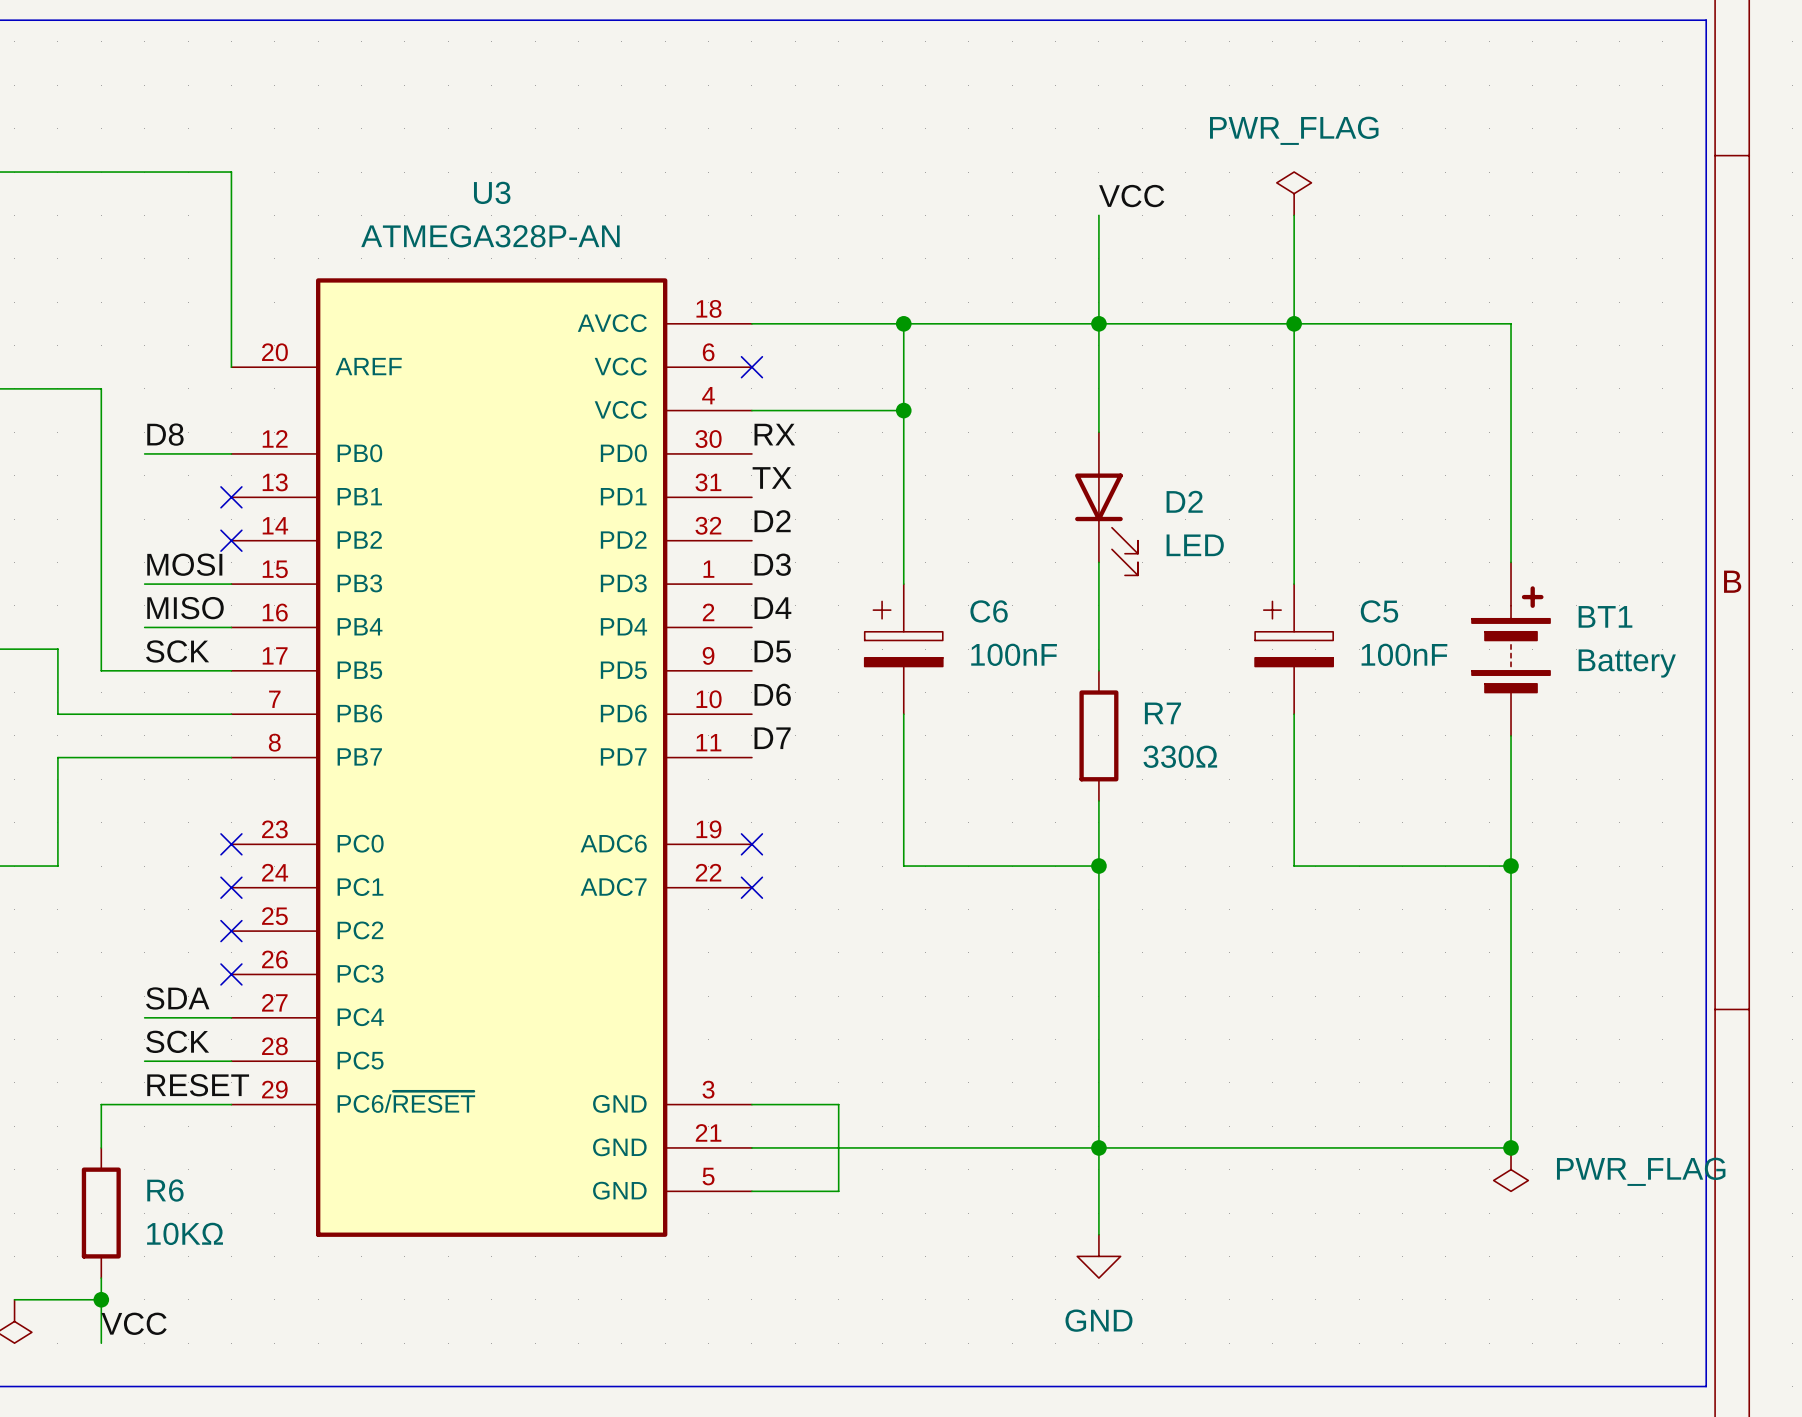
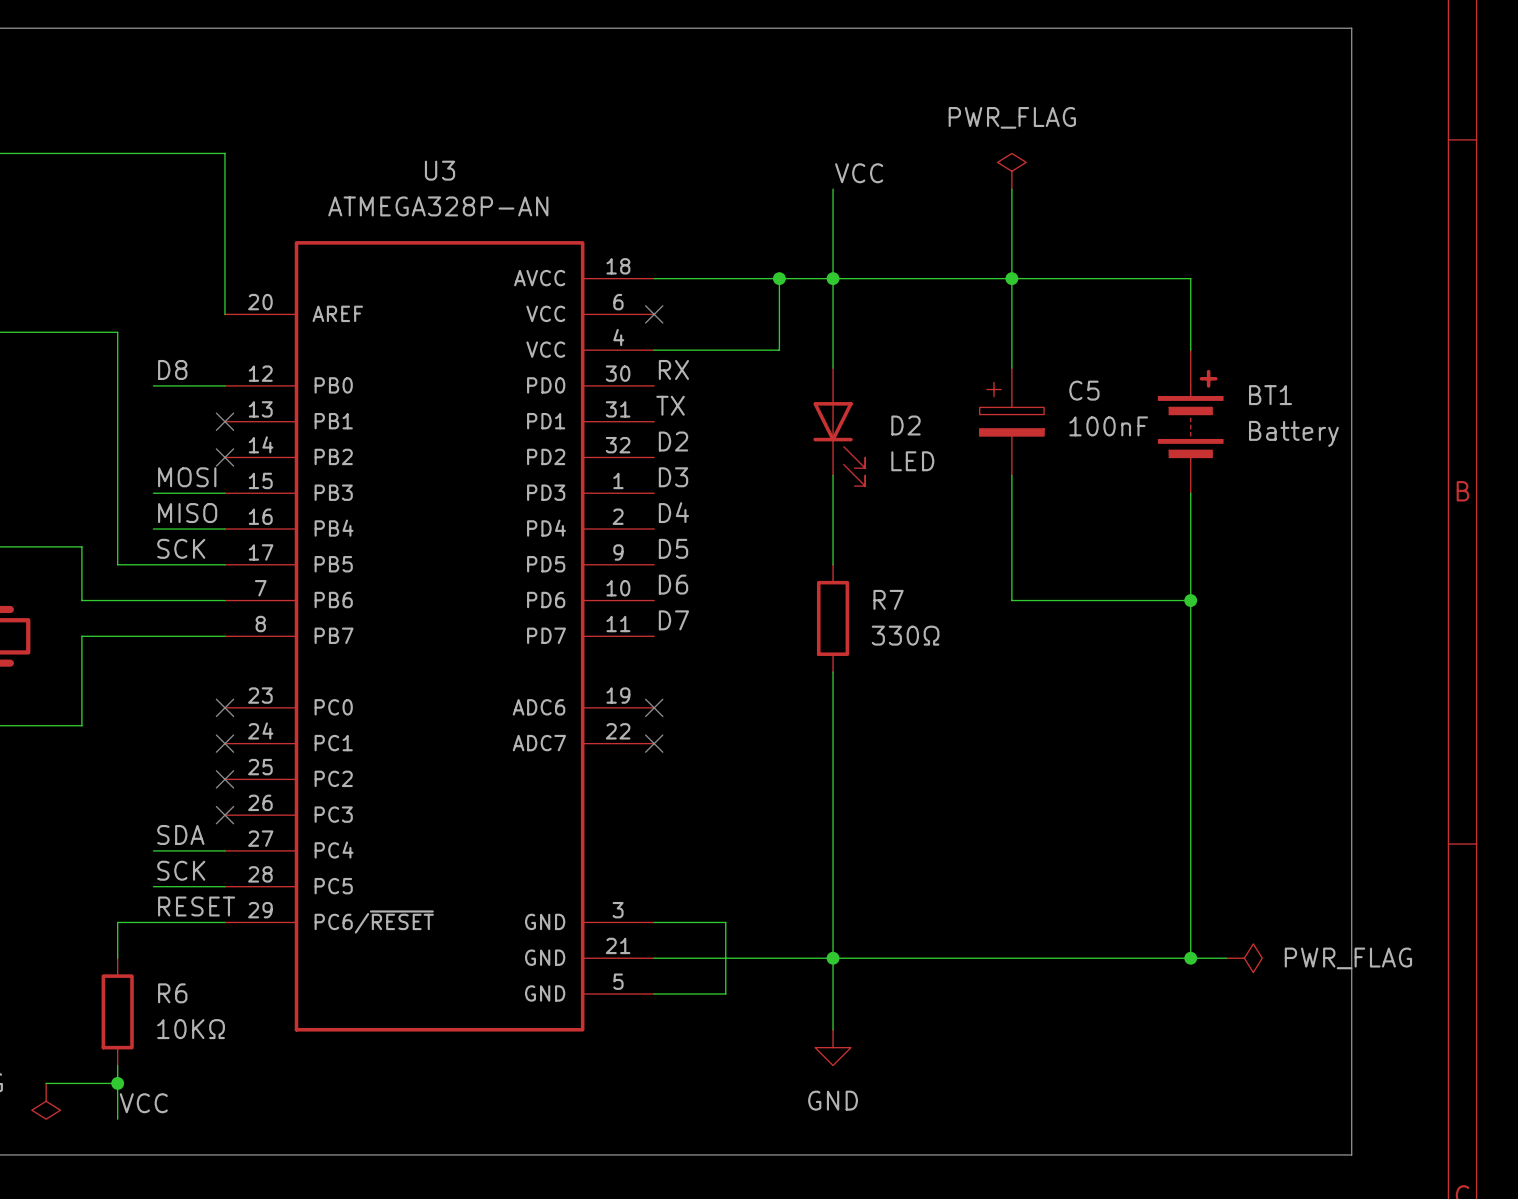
line: (1597, 20) (1706, 20) (1706, 1386) (1597, 1386) -> (1351, 28) (1351, 1154)
power symbol position: PWR_FLAG (1294, 193) -> PWR_FLAG (1011, 171)
label position: VCC (1131, 196) -> VCC (859, 173)
wire: (1098, 215) (1098, 432) -> (833, 189) (833, 368)
wire: none -> (1011, 189) (1011, 368)
wire: (1294, 215) (1294, 584) -> none
junction: none -> (833, 278)
junction: (1098, 323) -> none
junction: none -> (1011, 278)
junction: (1294, 323) -> none
wire: (1402, 323) (1511, 323) (1511, 562) -> (1190, 278) (1190, 350)
wire: (903, 410) (903, 584) -> none
junction: (903, 410) -> none
D2 position: (1106, 503) -> (839, 427)
wire: (1098, 562) (1098, 670) -> (833, 475) (833, 564)
wire: none -> (1190, 493) (1190, 958)
C6: 100nF (903, 649) -> none
C5 position: (1294, 649) -> (1011, 421)
BT1 position: (1511, 649) -> (1190, 421)
wire: (903, 714) (903, 866) (1098, 866) -> none
wire: (1294, 714) (1294, 866) (1511, 866) -> (1011, 475) (1011, 600) (1190, 600)
junction: none -> (1190, 600)
R7 position: (1098, 735) -> (833, 618)
wire: (1511, 735) (1511, 1147) (1445, 1147) -> none
wire: (1098, 800) (1098, 1234) -> (833, 672) (833, 1029)
junction: (1098, 866) -> none
junction: (1511, 866) -> none
junction: none -> (833, 958)
junction: (1098, 1147) -> none
junction: none -> (1190, 958)
junction: (1511, 1147) -> none
power symbol rotation: 0° (1511, 1169) -> 90° counterclockwise (1244, 958)
power symbol position: PWR_FLAG (1511, 1169) -> PWR_FLAG (1244, 958)
power symbol position: GND (1098, 1256) -> GND (833, 1047)

